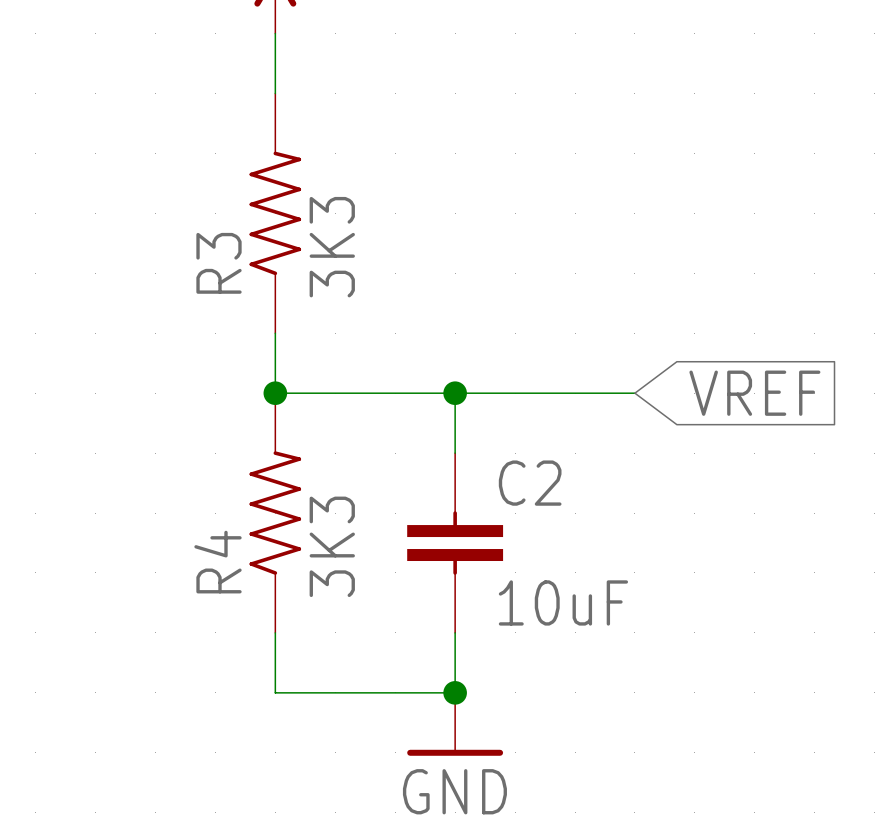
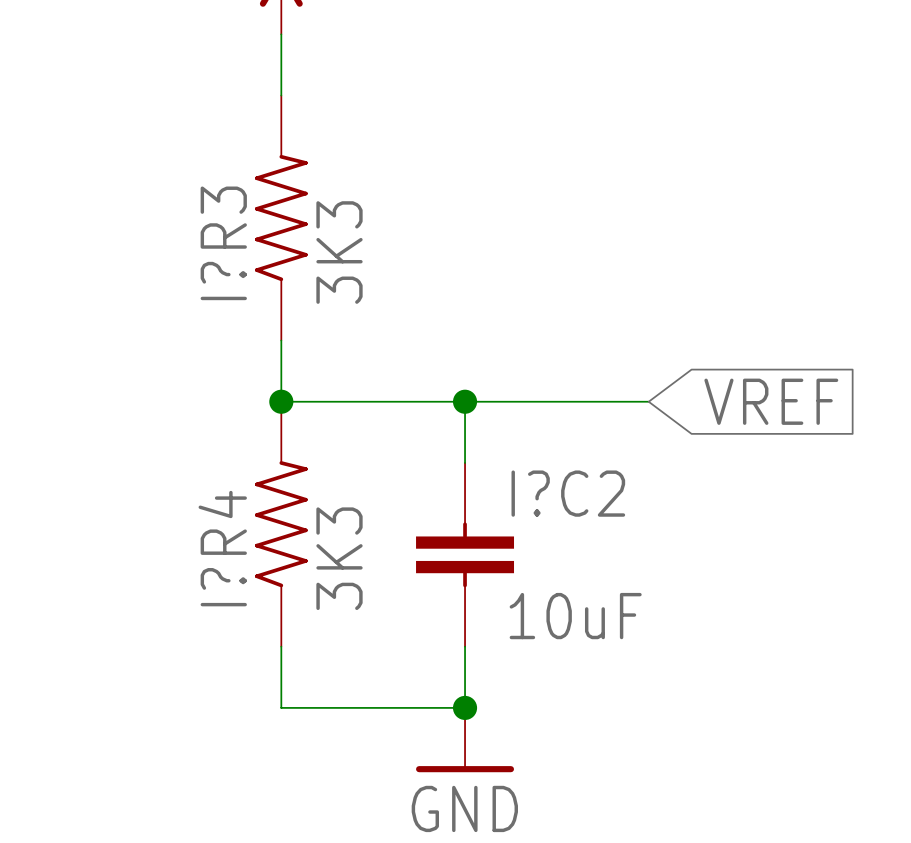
R3 name: R3 (219, 263) -> I?R3 (223, 243)
C2 name: C2 (530, 483) -> I?C2 (568, 493)
R4 name: R4 (218, 562) -> I?R4 (222, 548)

